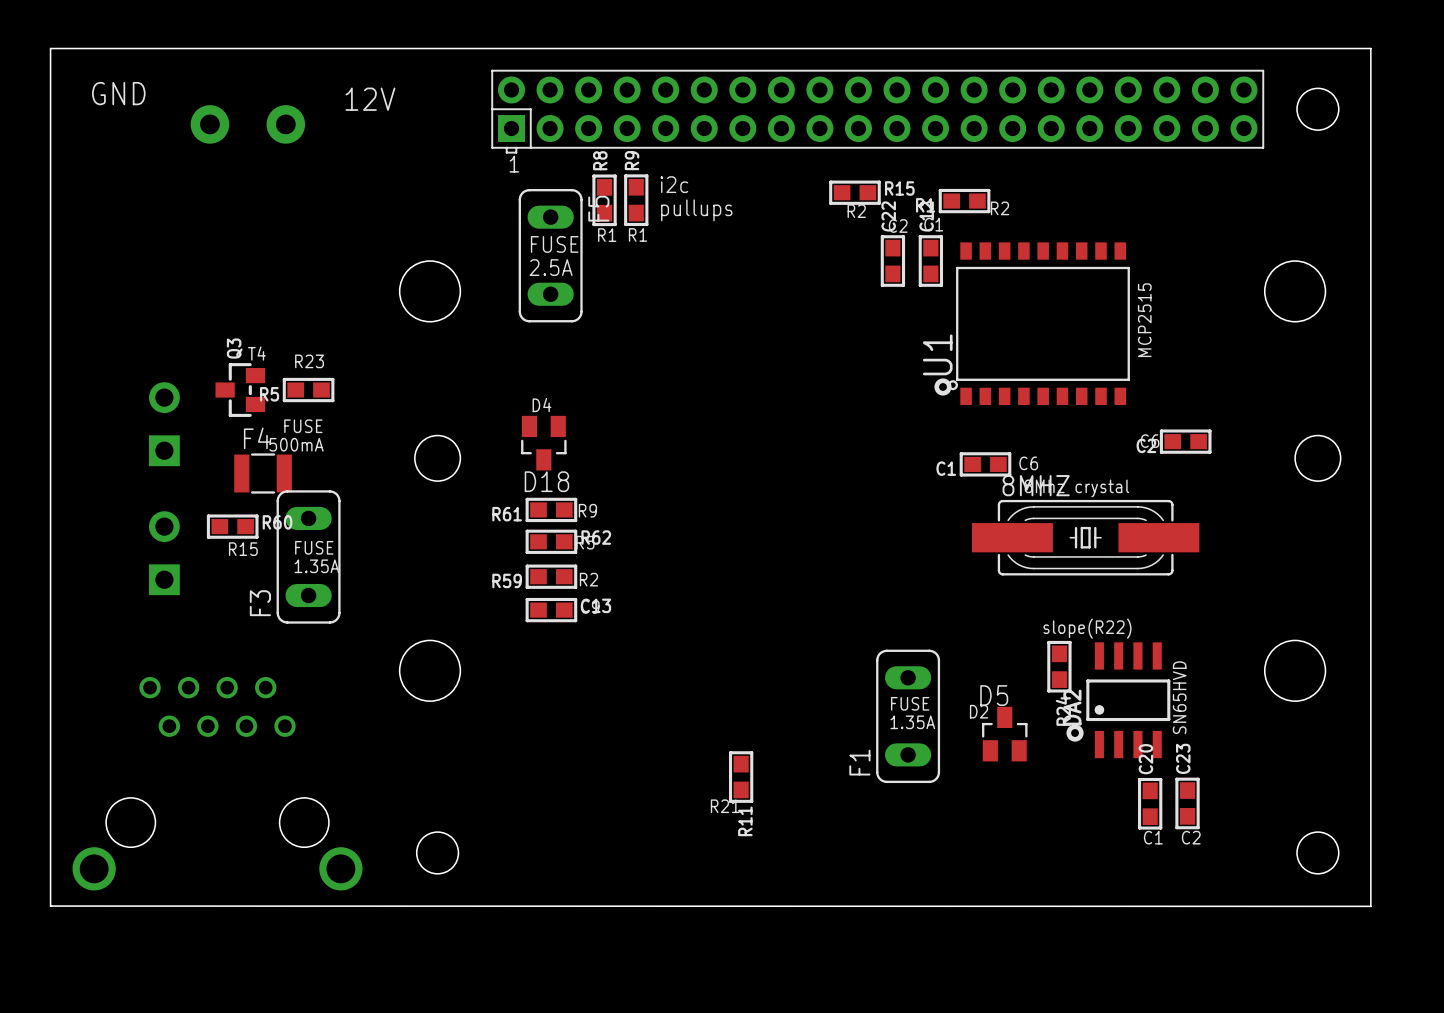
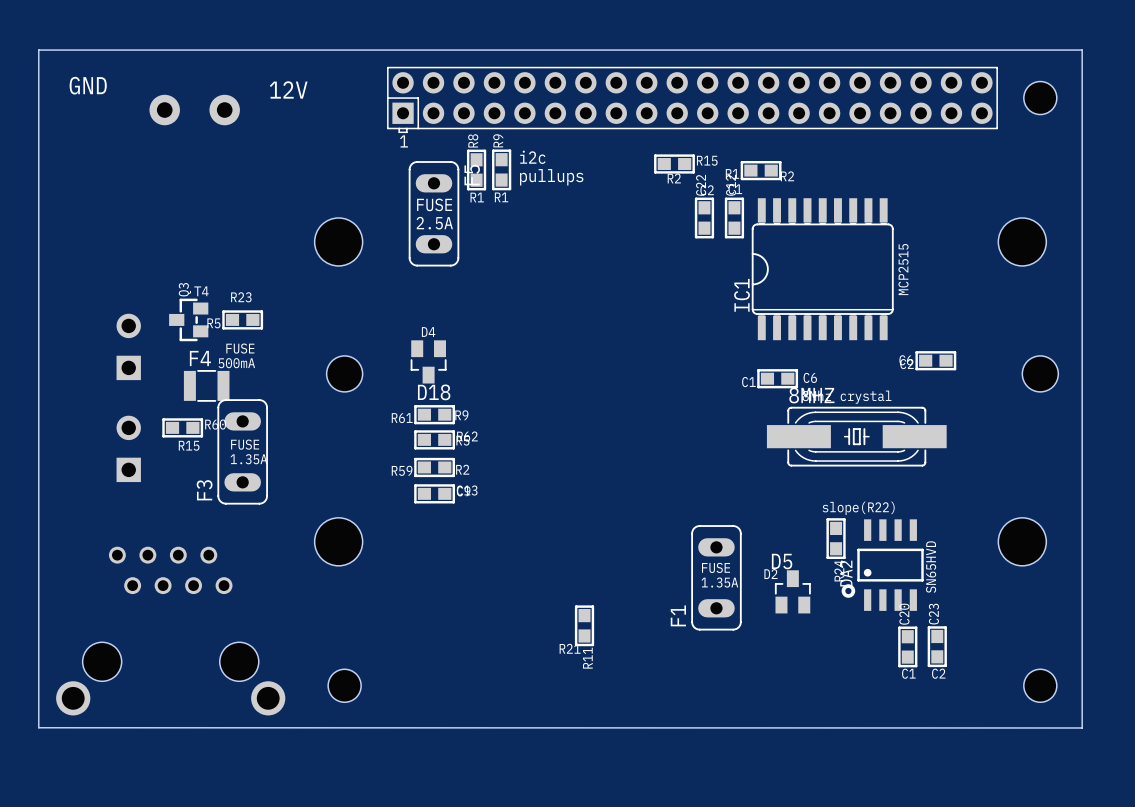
U1: (1038, 323) -> none
IC1: none -> (822, 269)
drawing: [934, 378, 952, 396] -> none

